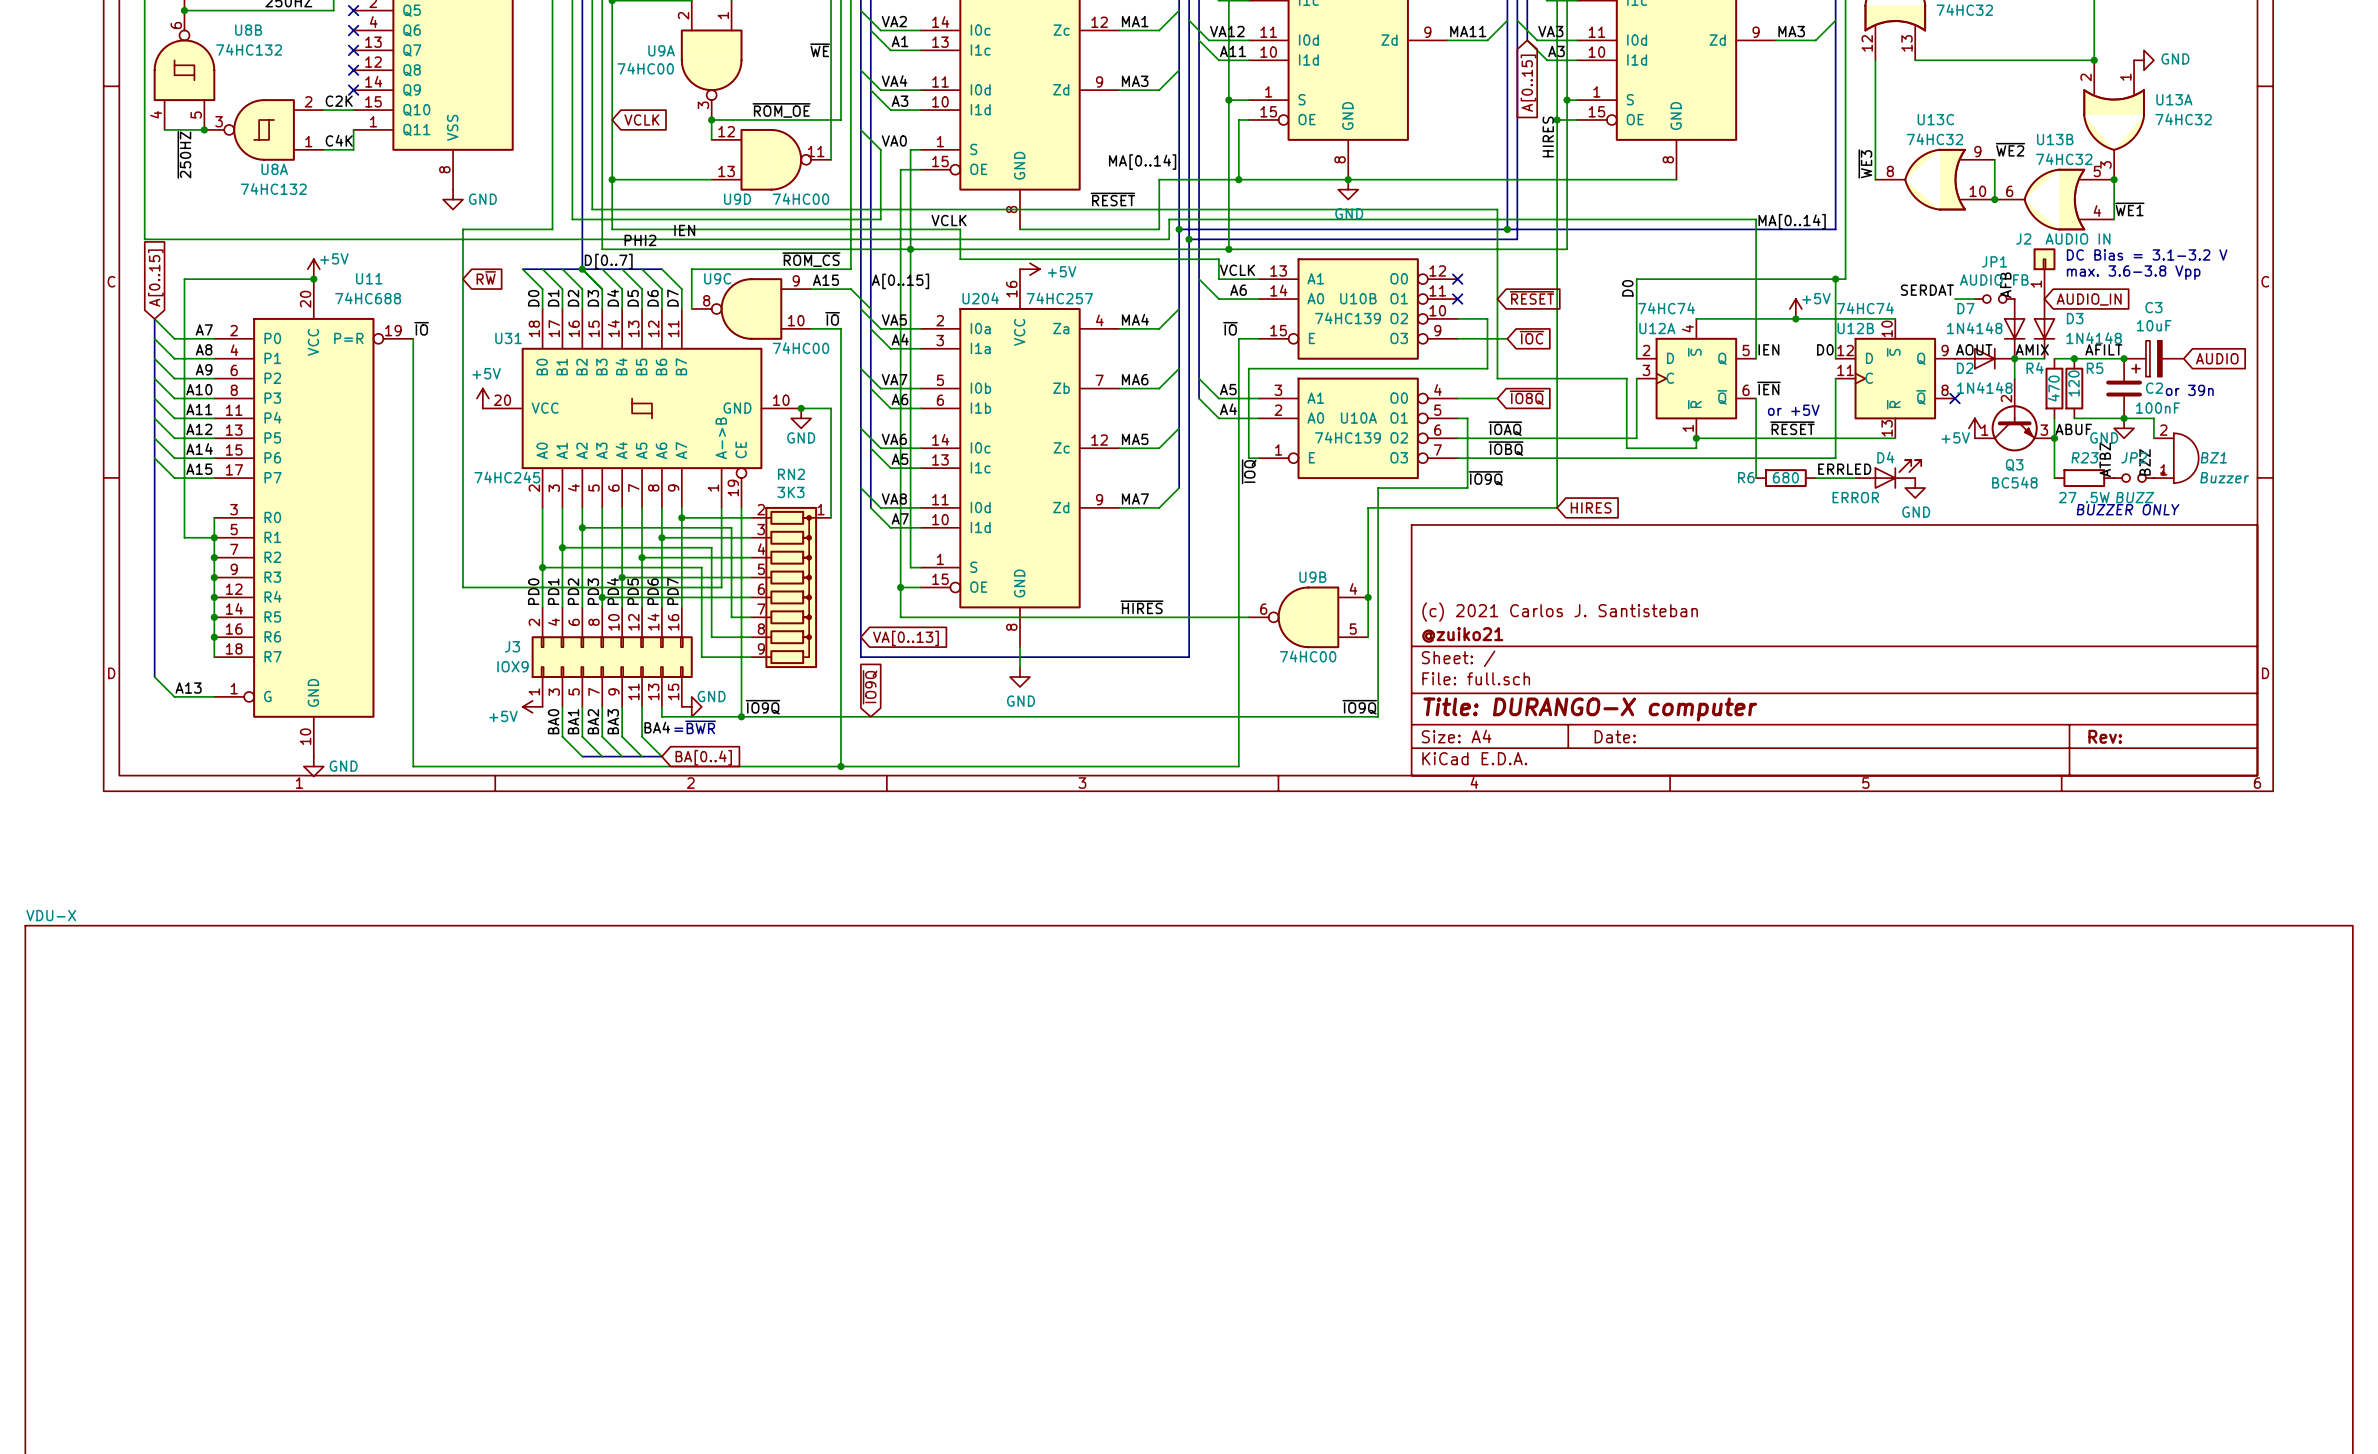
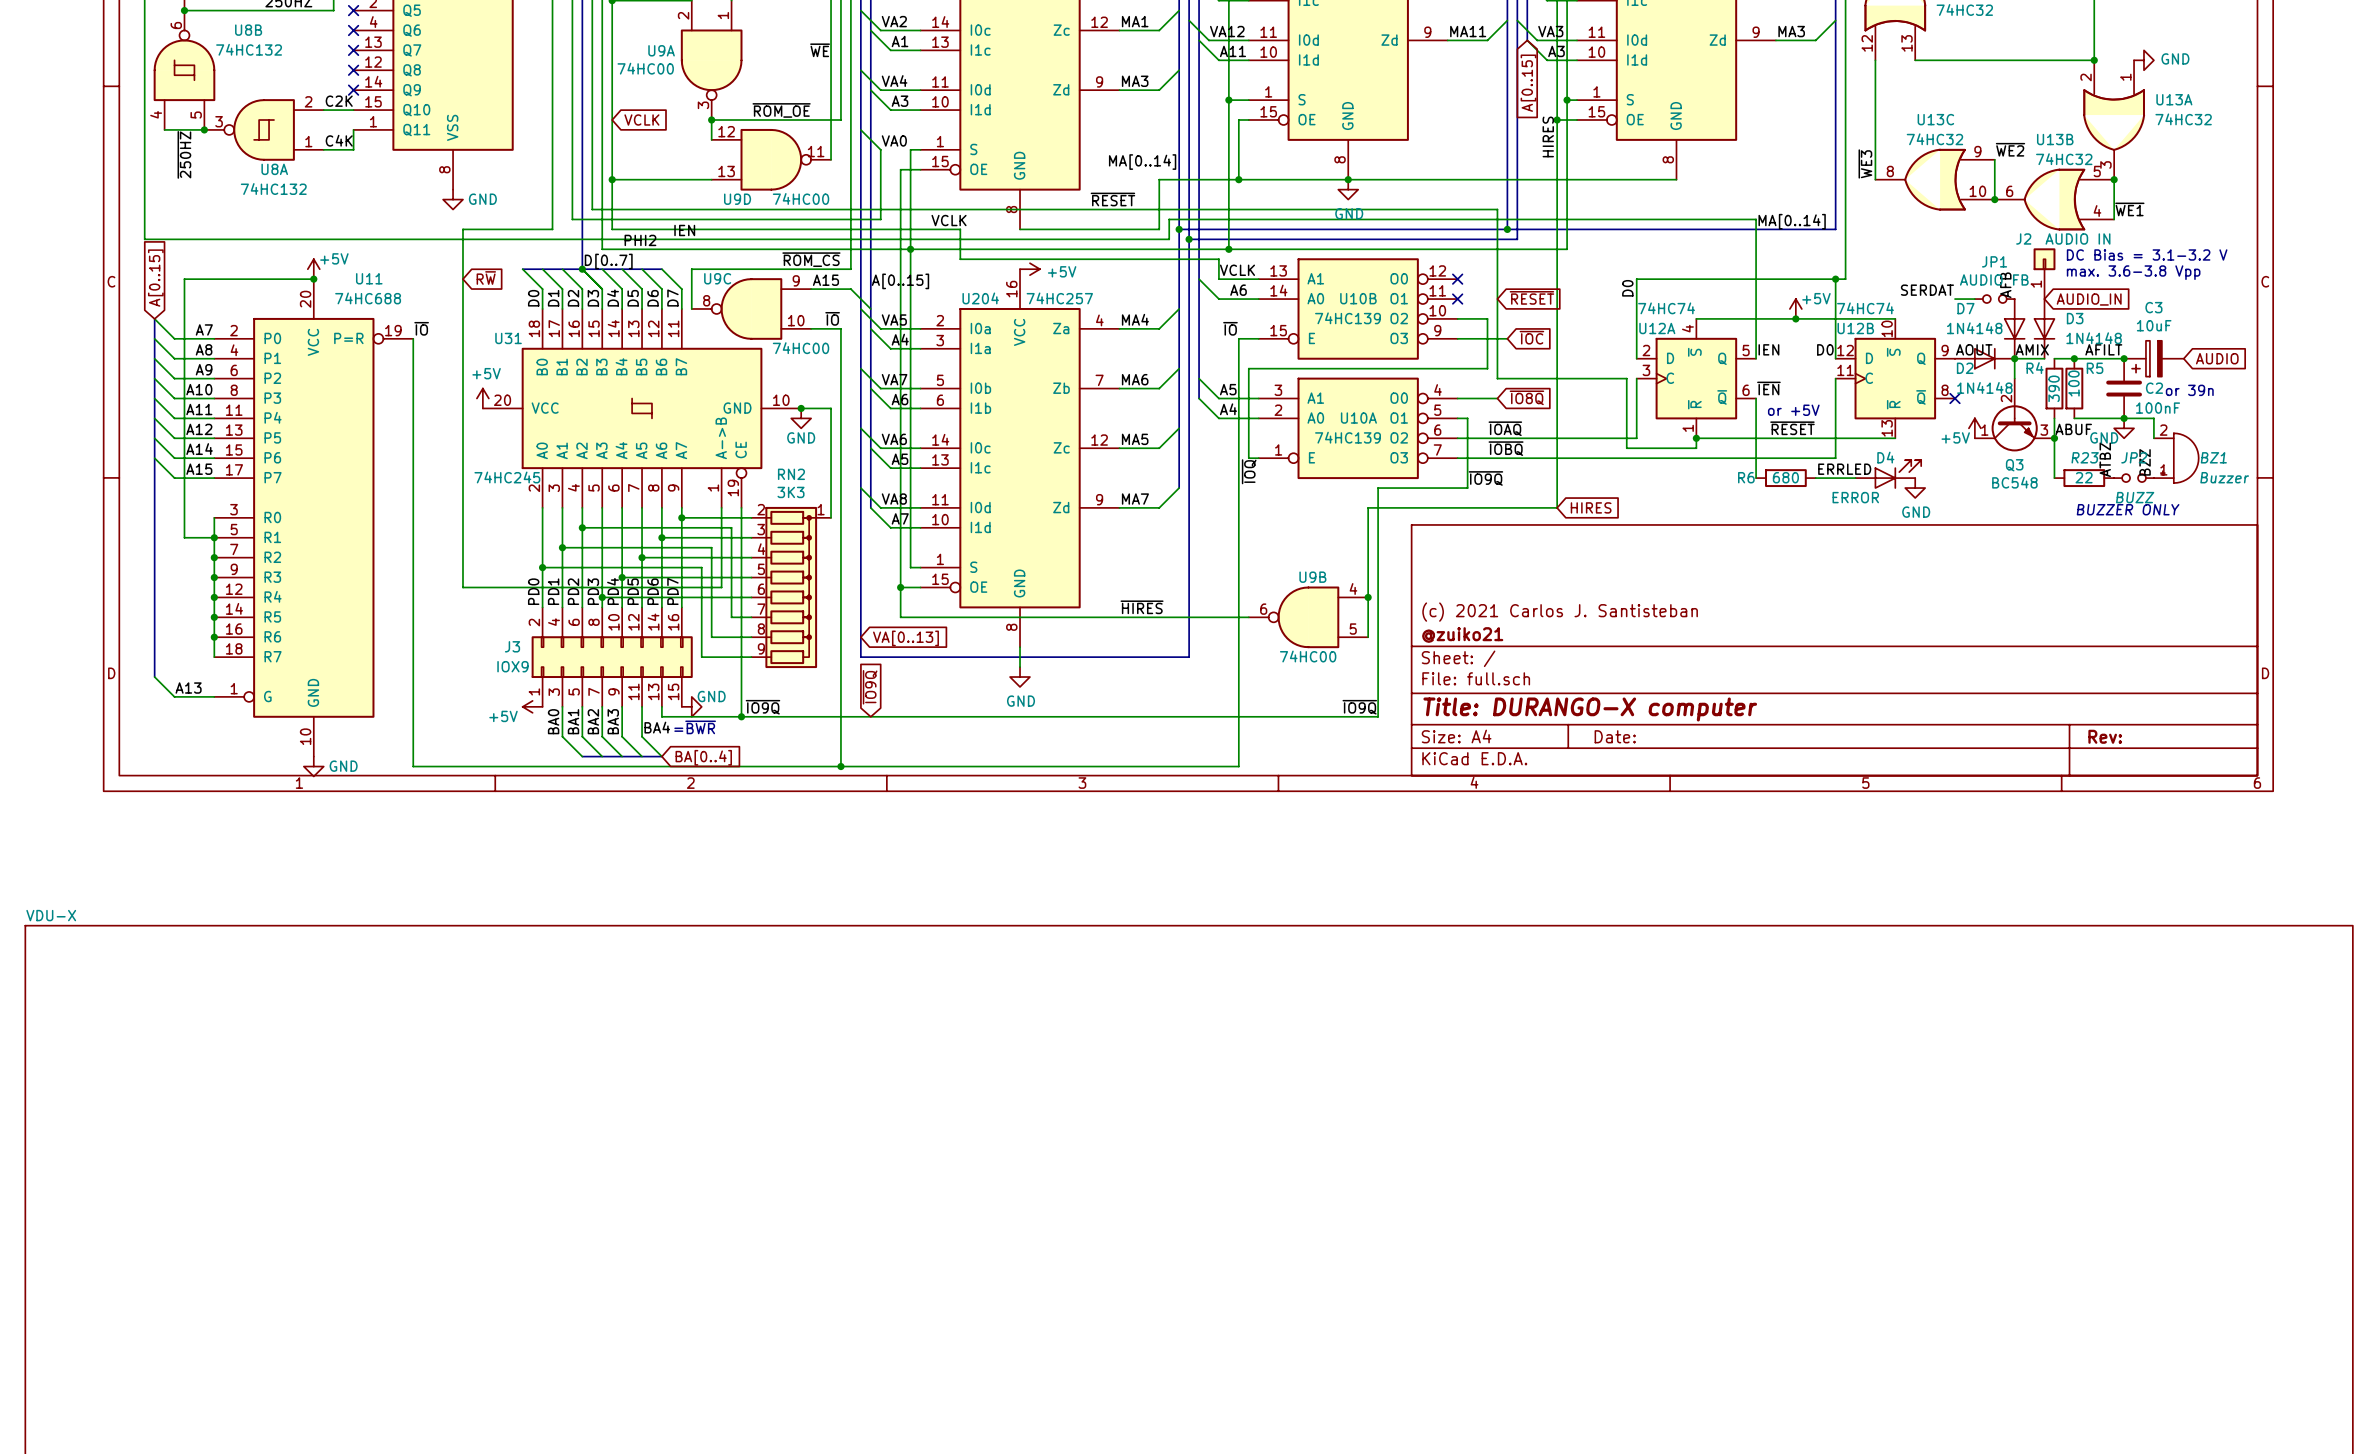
R5 value: 120 (2073, 383) -> 100 (2073, 383)
R4 value: 470 (2053, 388) -> 390 (2054, 388)
R23 value: 27 .5W (2084, 497) -> 22 (2084, 477)

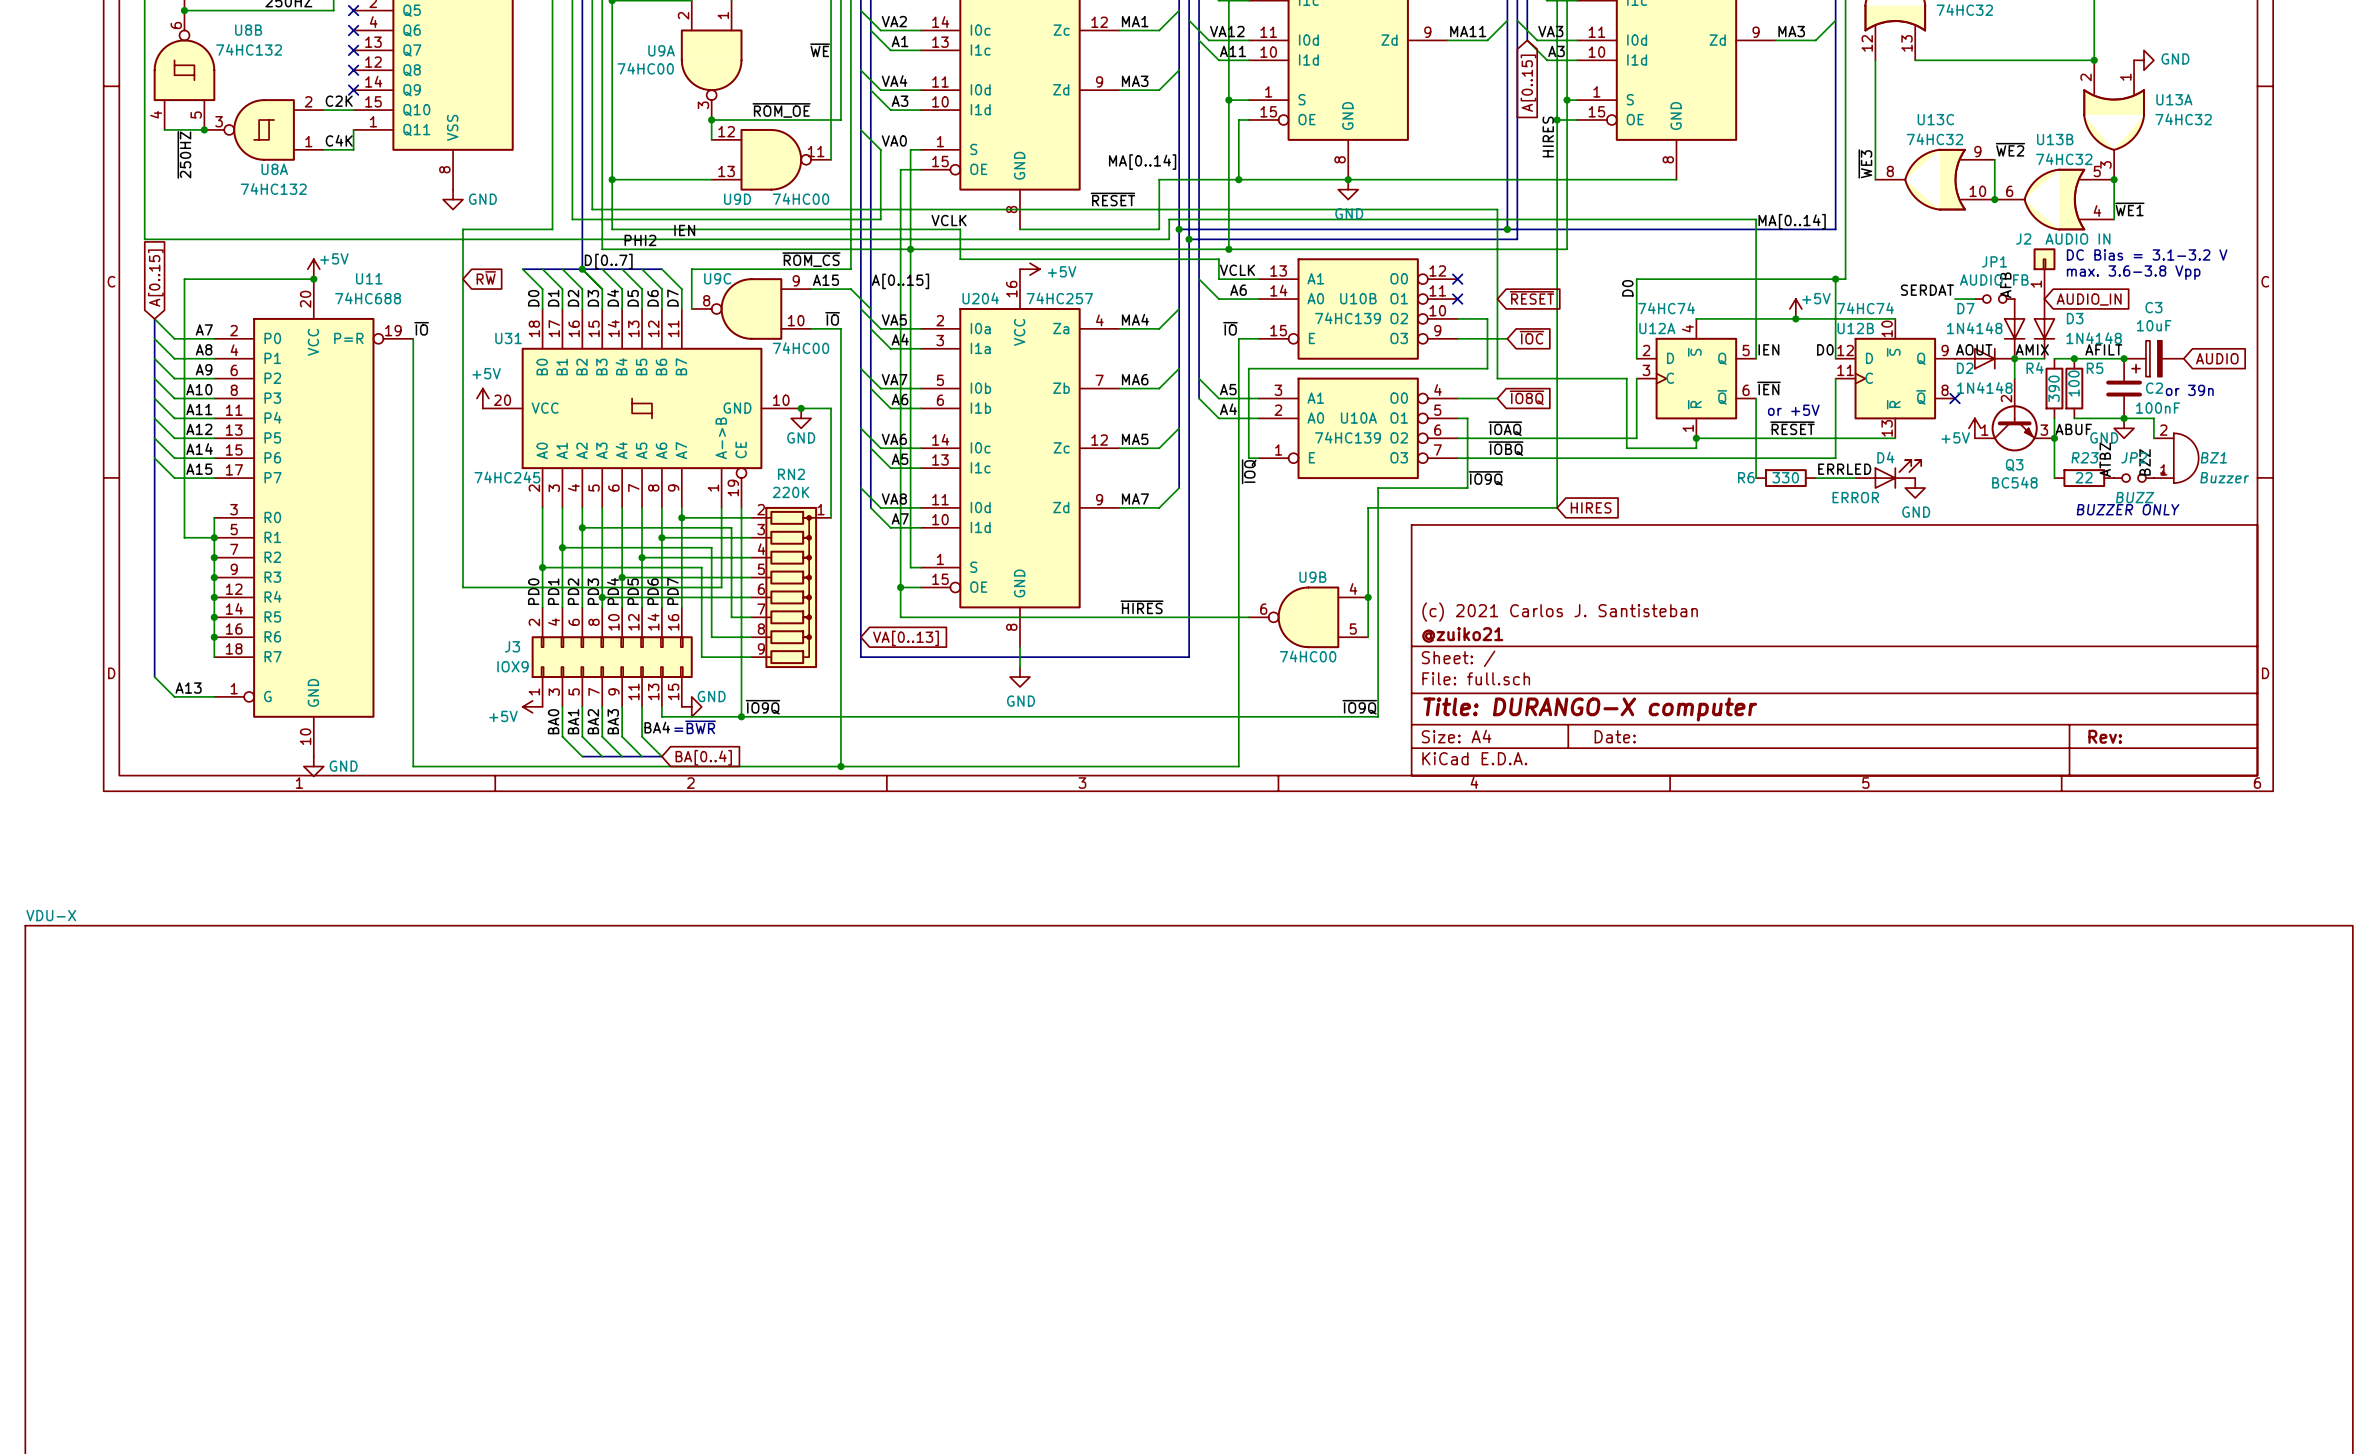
global label: VCLK (641, 120) -> none
R6 value: 680 (1785, 477) -> 330 (1785, 477)
RN2 value: 3K3 (790, 492) -> 220K (790, 492)
global label: ~{IO9Q} (870, 687) -> none

